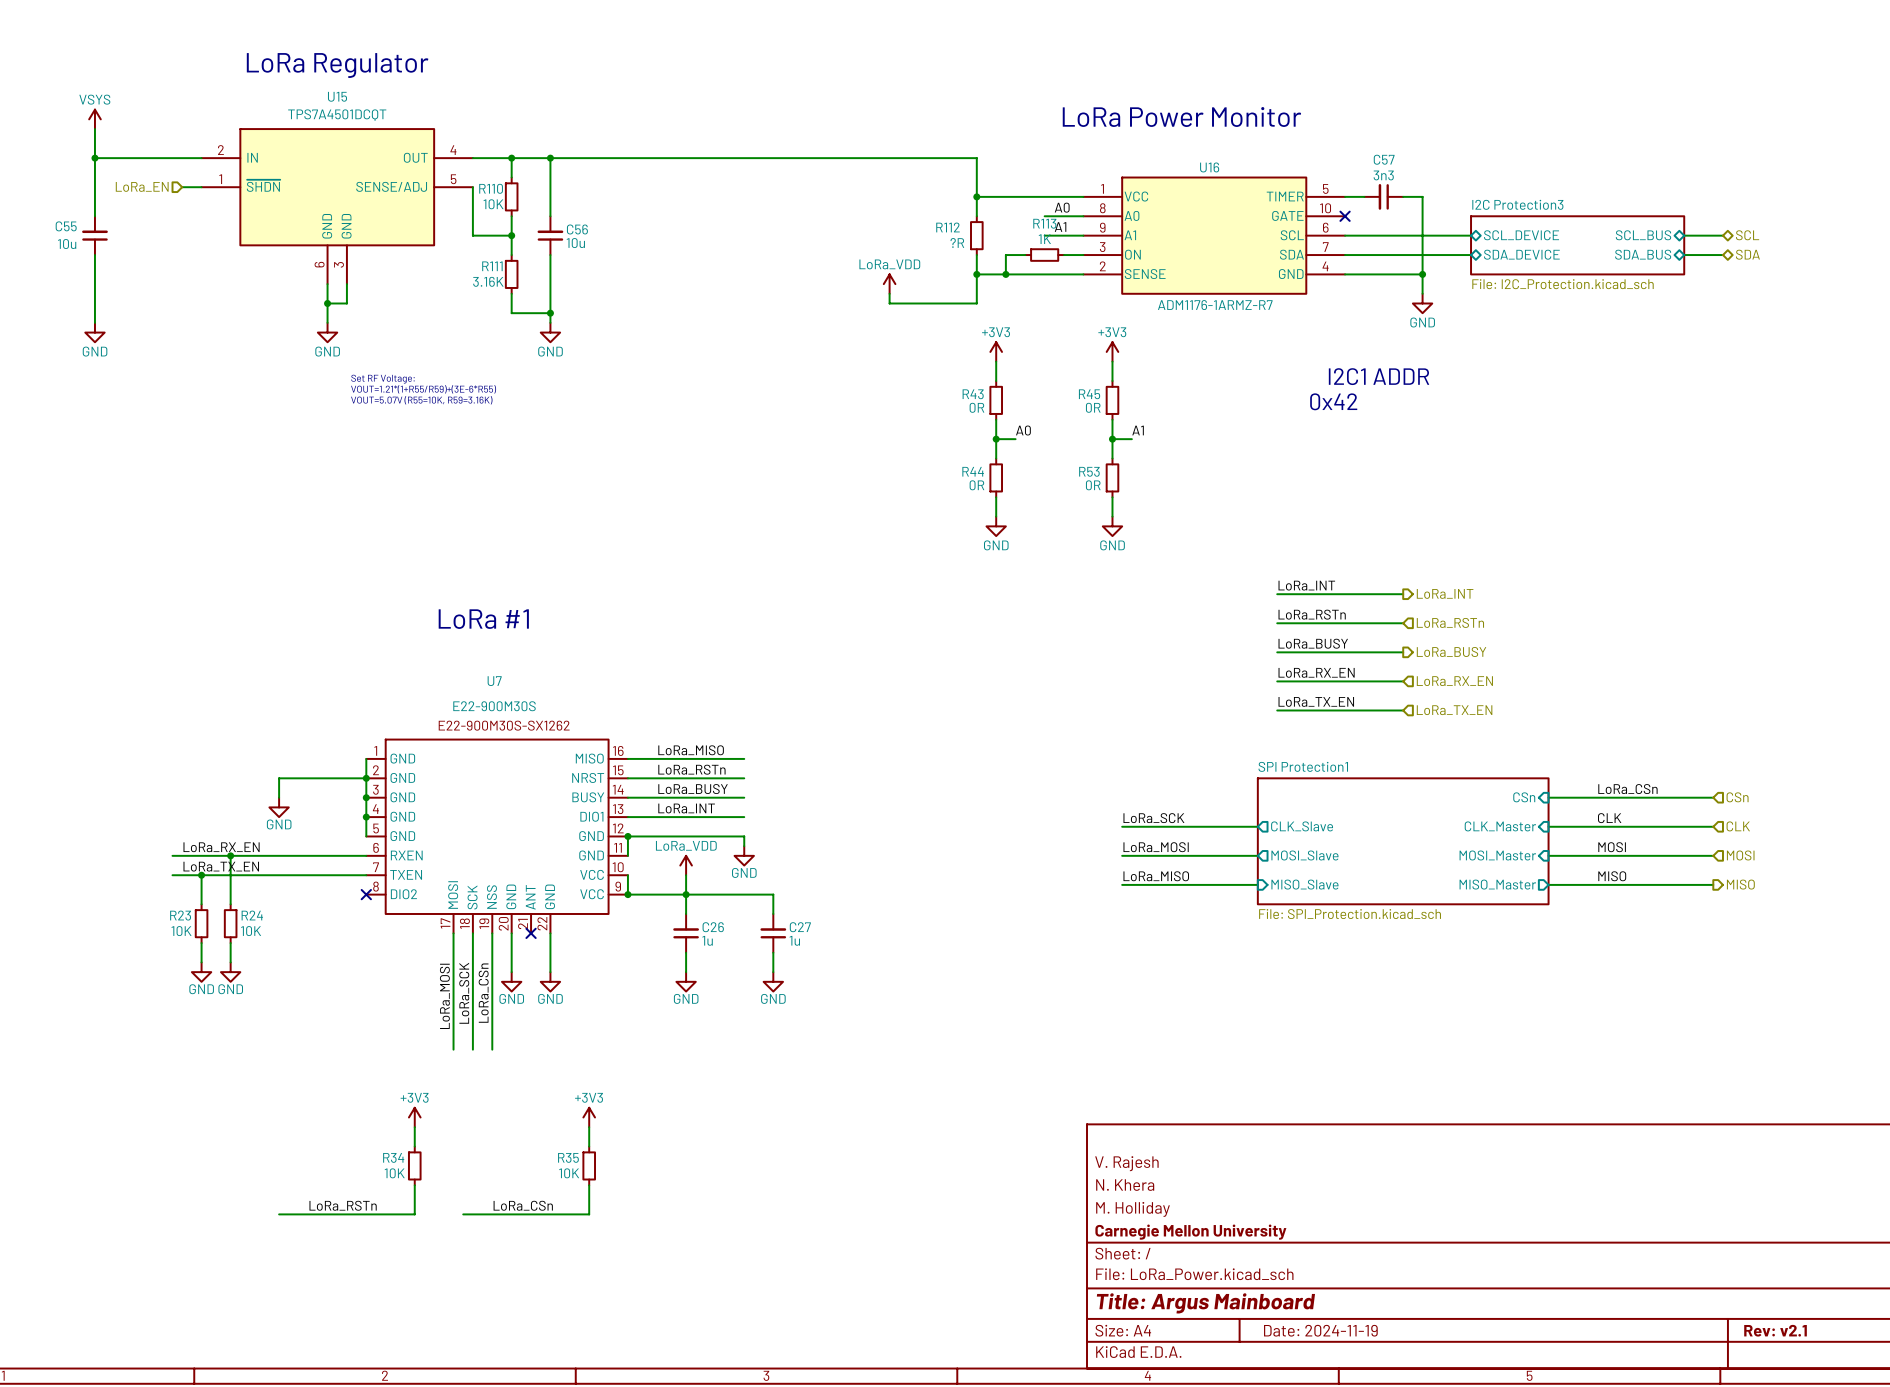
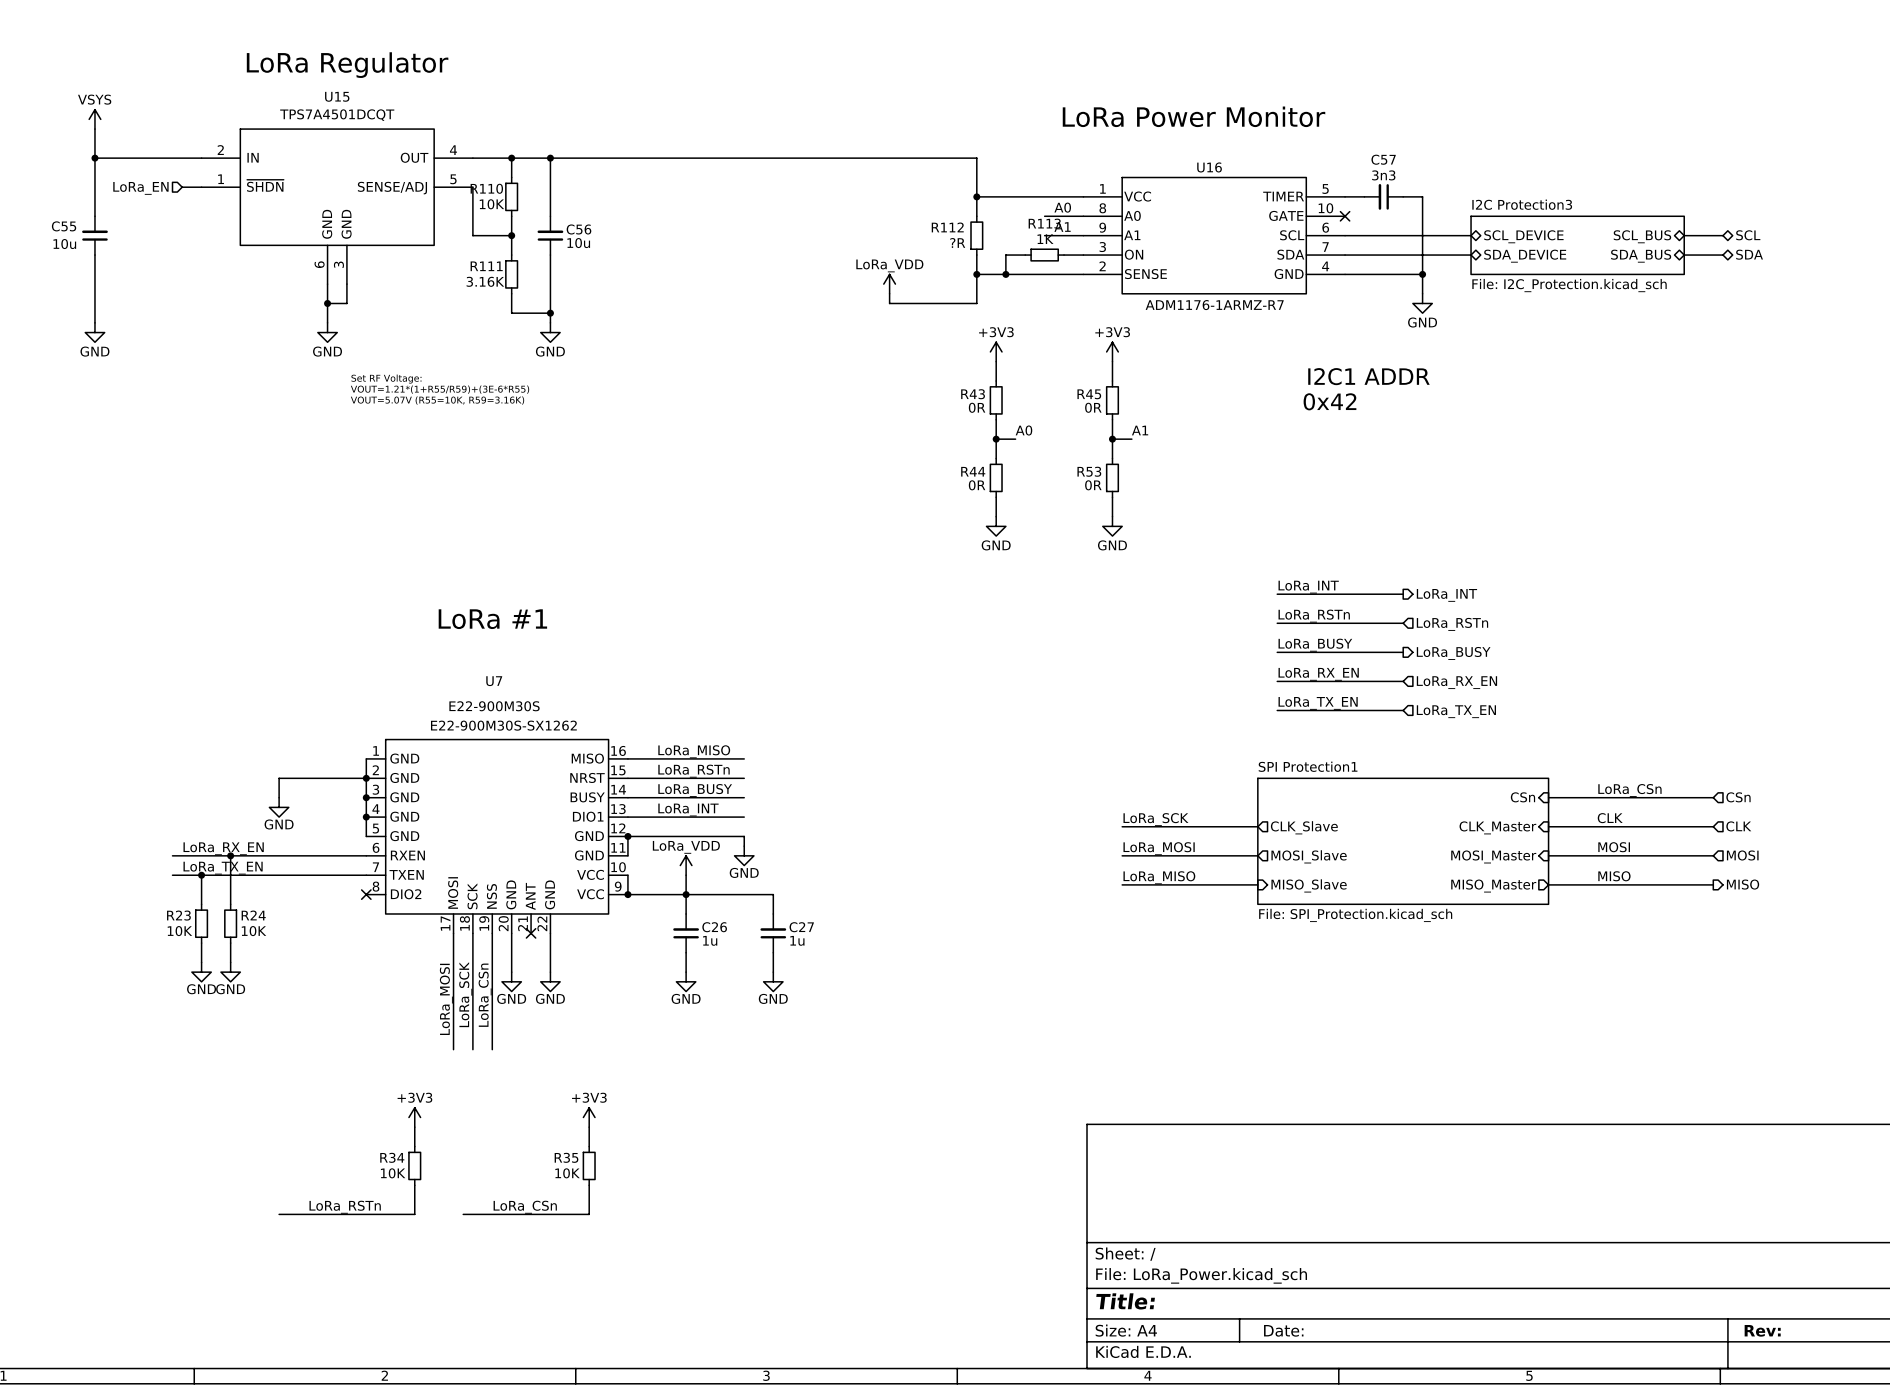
title block: V. Rajesh (1126, 1163) -> none
title block: N. Khera (1125, 1185) -> none
title block: M. Holliday (1133, 1209) -> none
title block: Carnegie Mellon University (1190, 1232) -> none
title block: Title: Argus Mainboard (1205, 1303) -> Title: (1125, 1301)
title block: Date: 2024-11-19 (1320, 1330) -> Date: (1283, 1330)
title block: Rev: v2.1 (1775, 1330) -> Rev: (1762, 1330)

